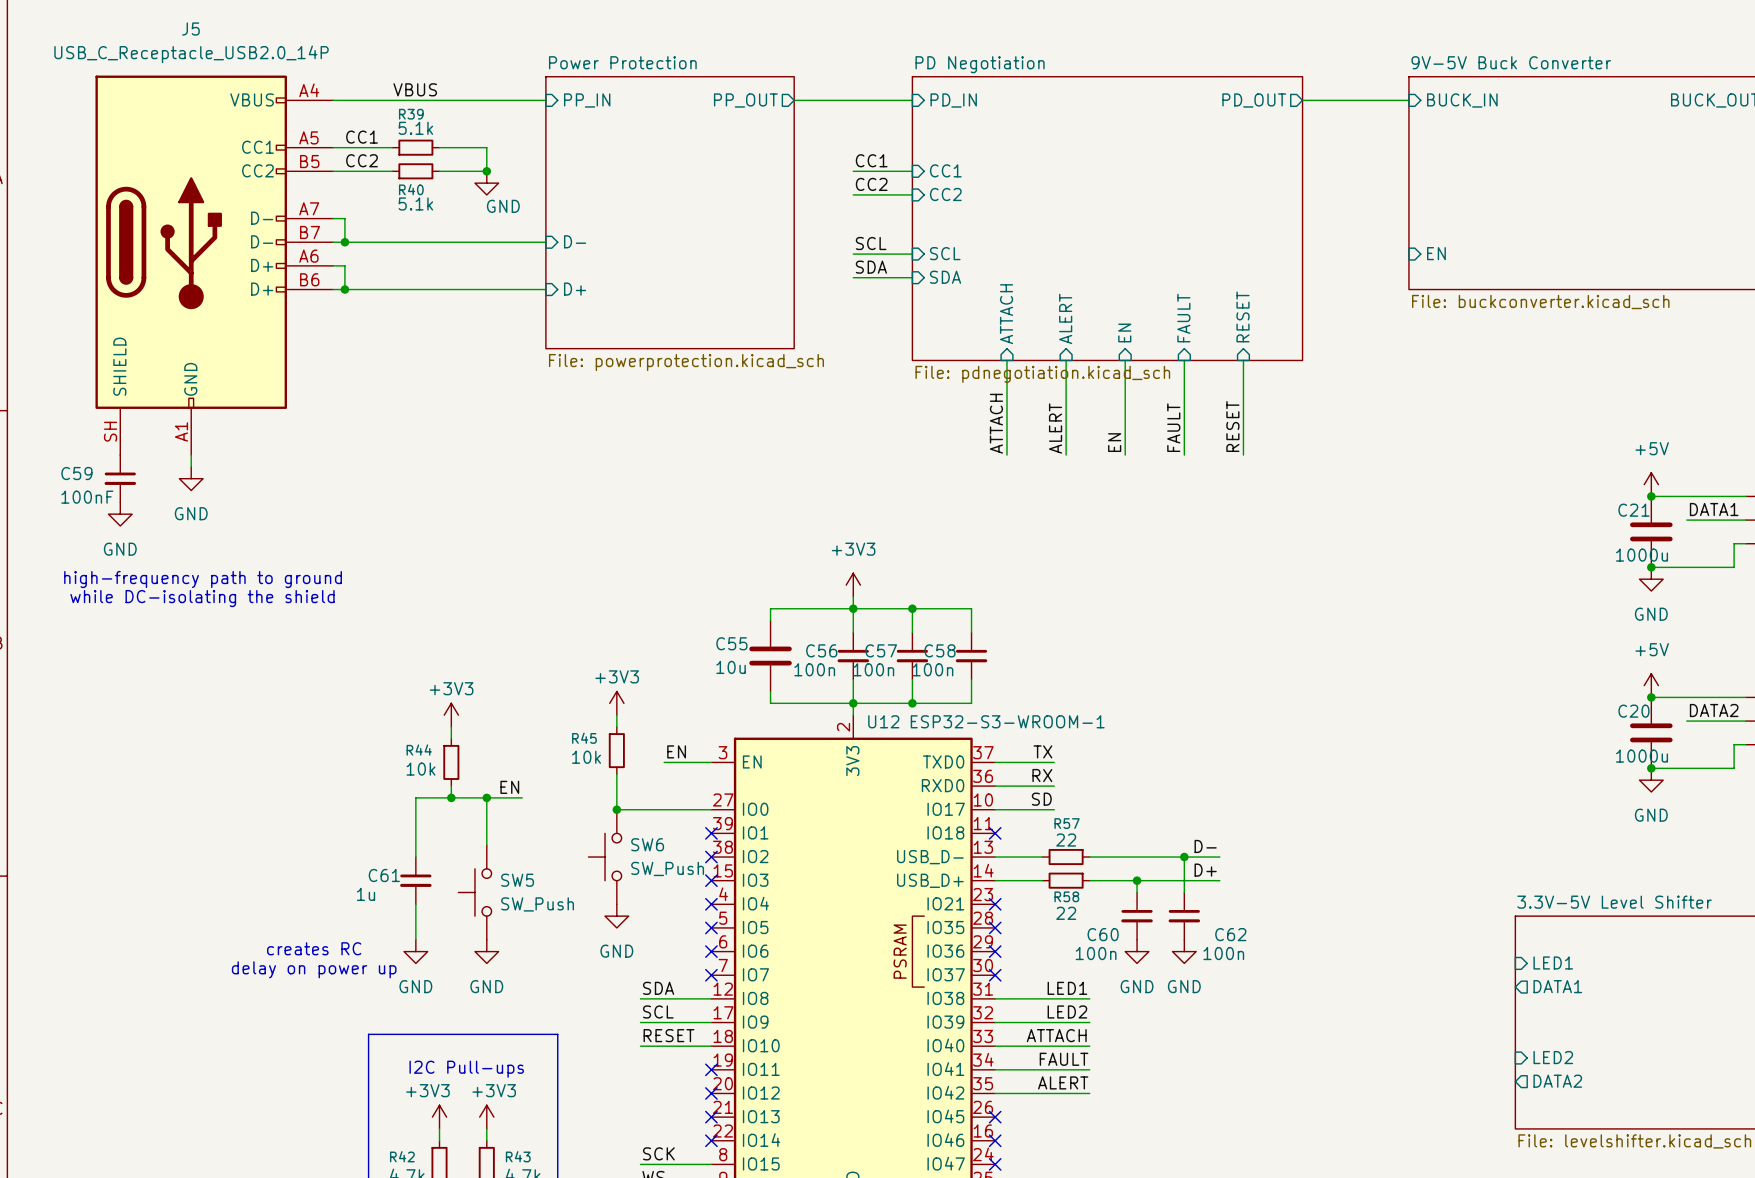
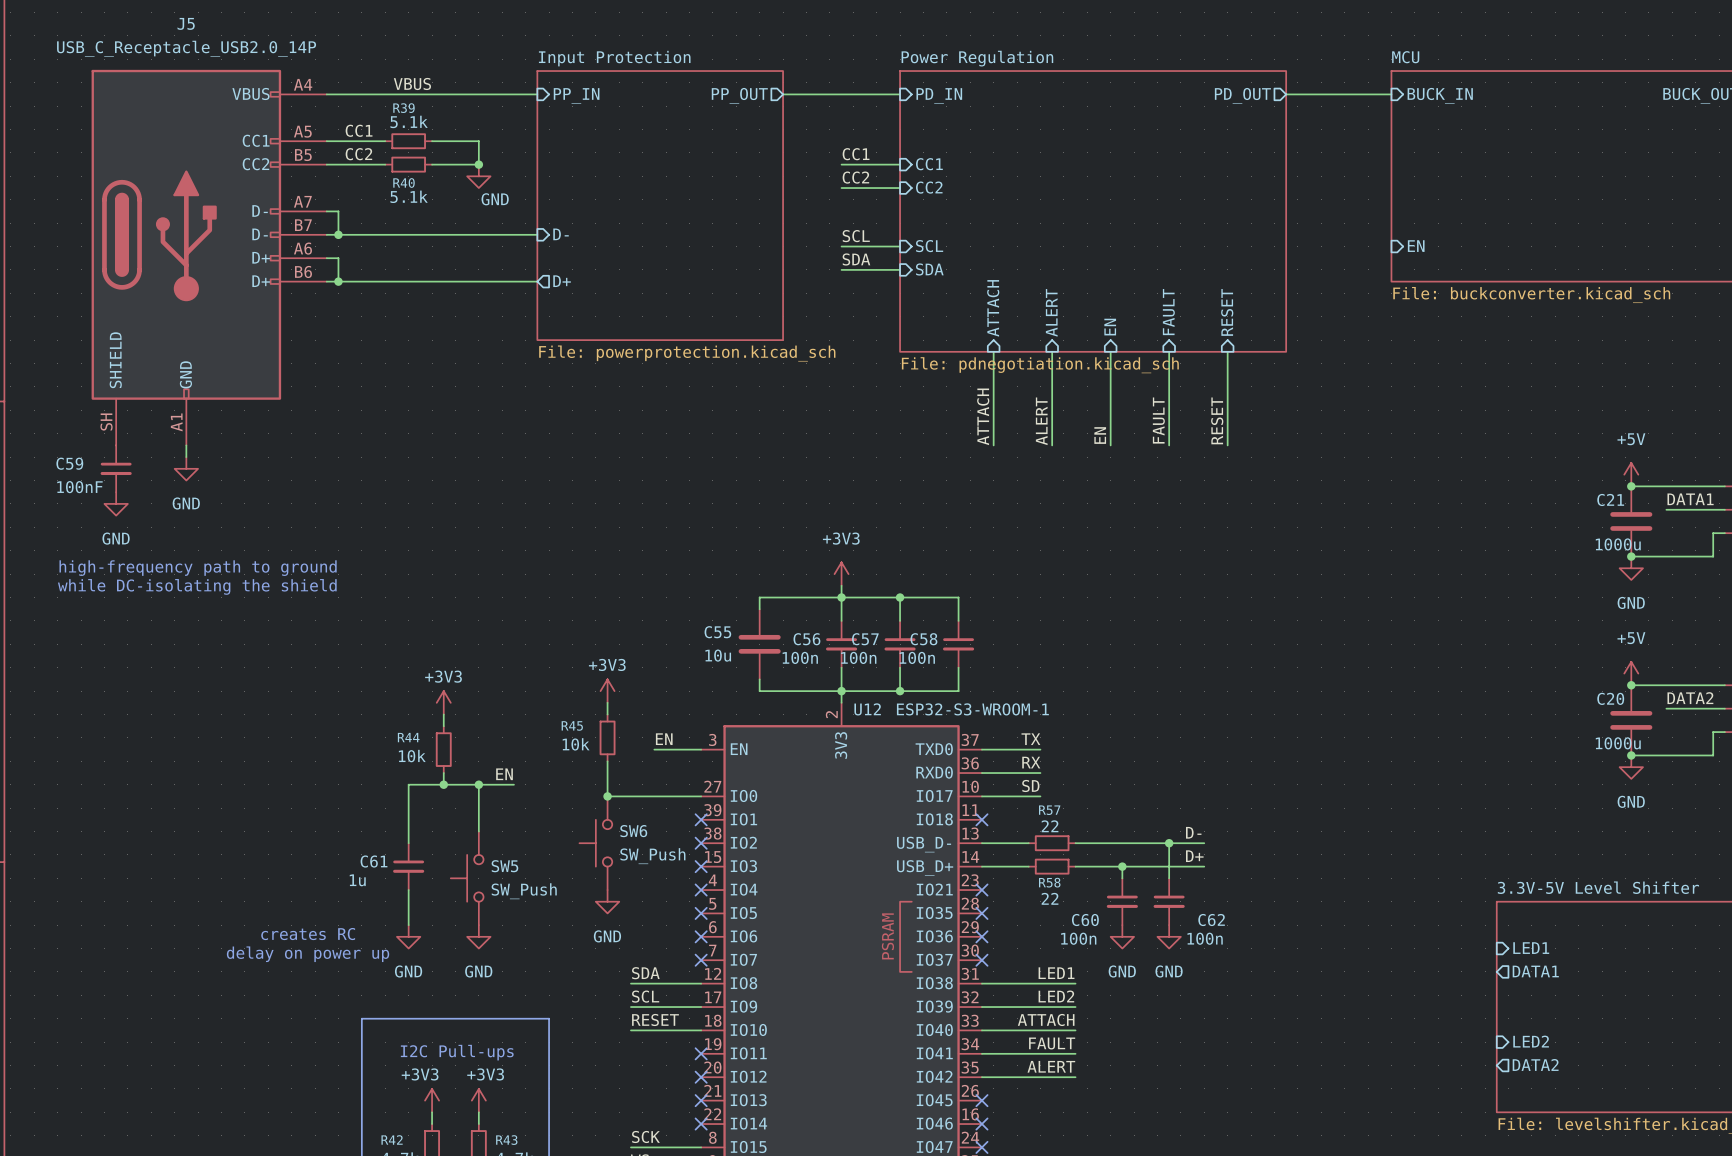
sheet Power Protection name: Power Protection (622, 62) -> Input Protection (614, 58)
sheet 9V-5V Buck Converter name: 9V-5V Buck Converter (1511, 62) -> MCU (1405, 57)
sheet PD Negotiation name: PD Negotiation (980, 64) -> Power Regulation (977, 58)
sheet pin shape: input (575, 289) -> output (562, 281)

